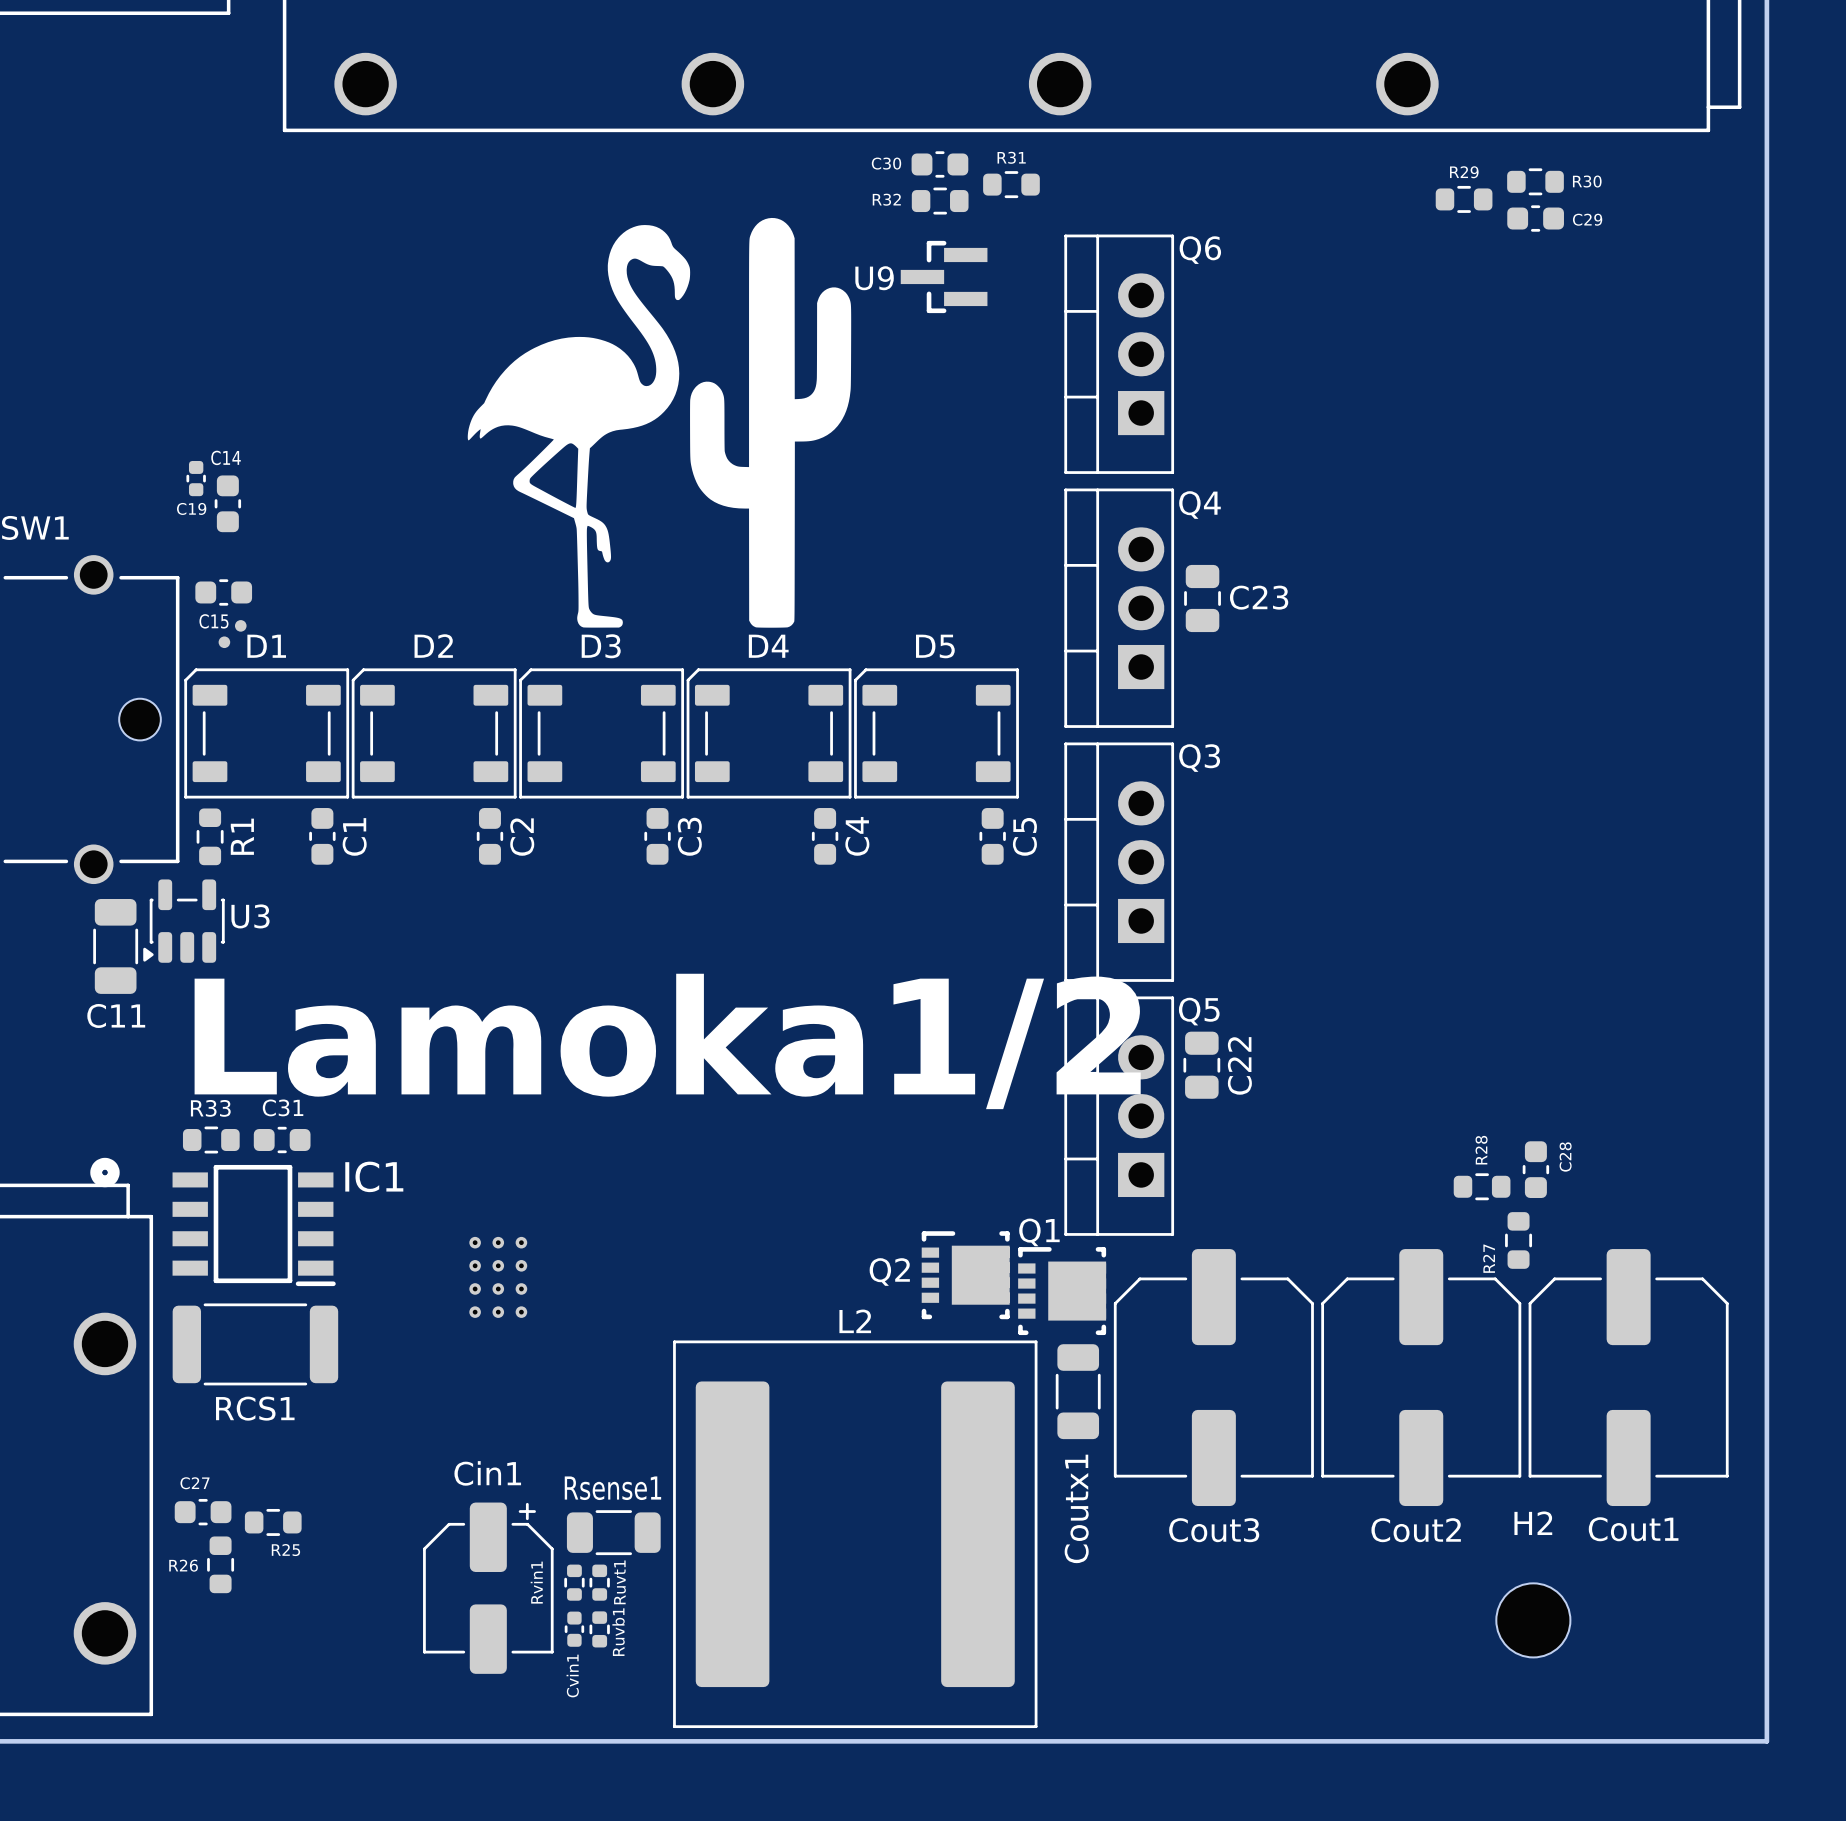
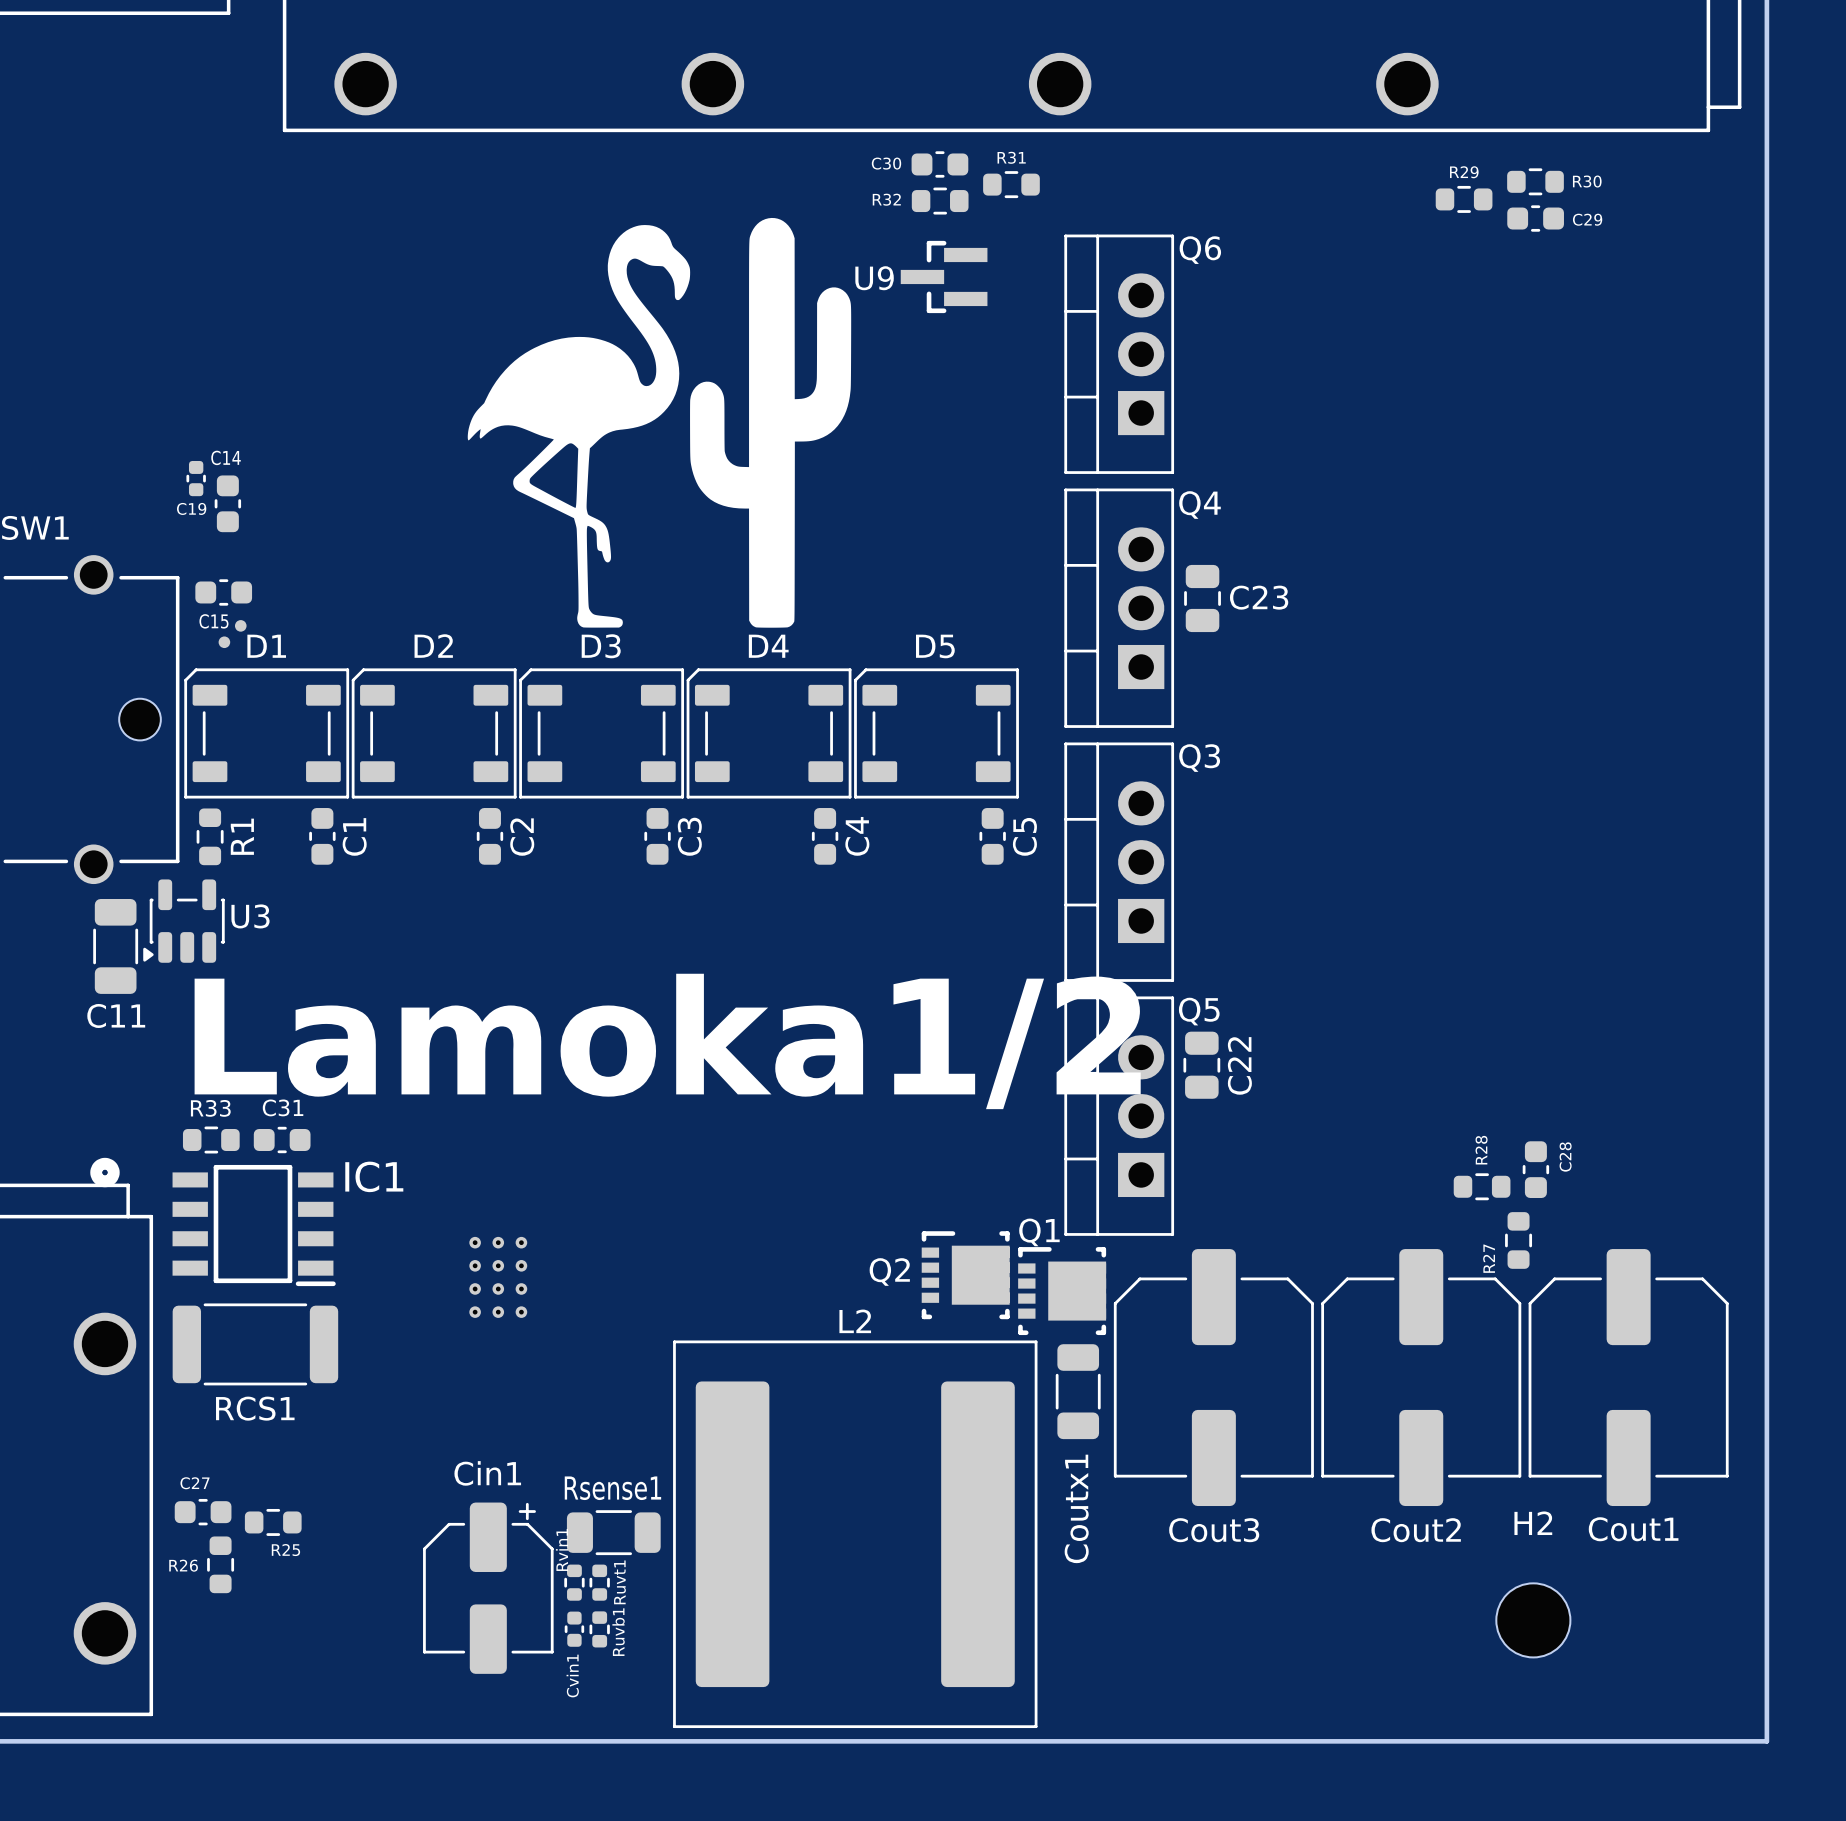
Rvin1 name position: Rvin1 (536, 1582) -> Rvin1 (561, 1549)

